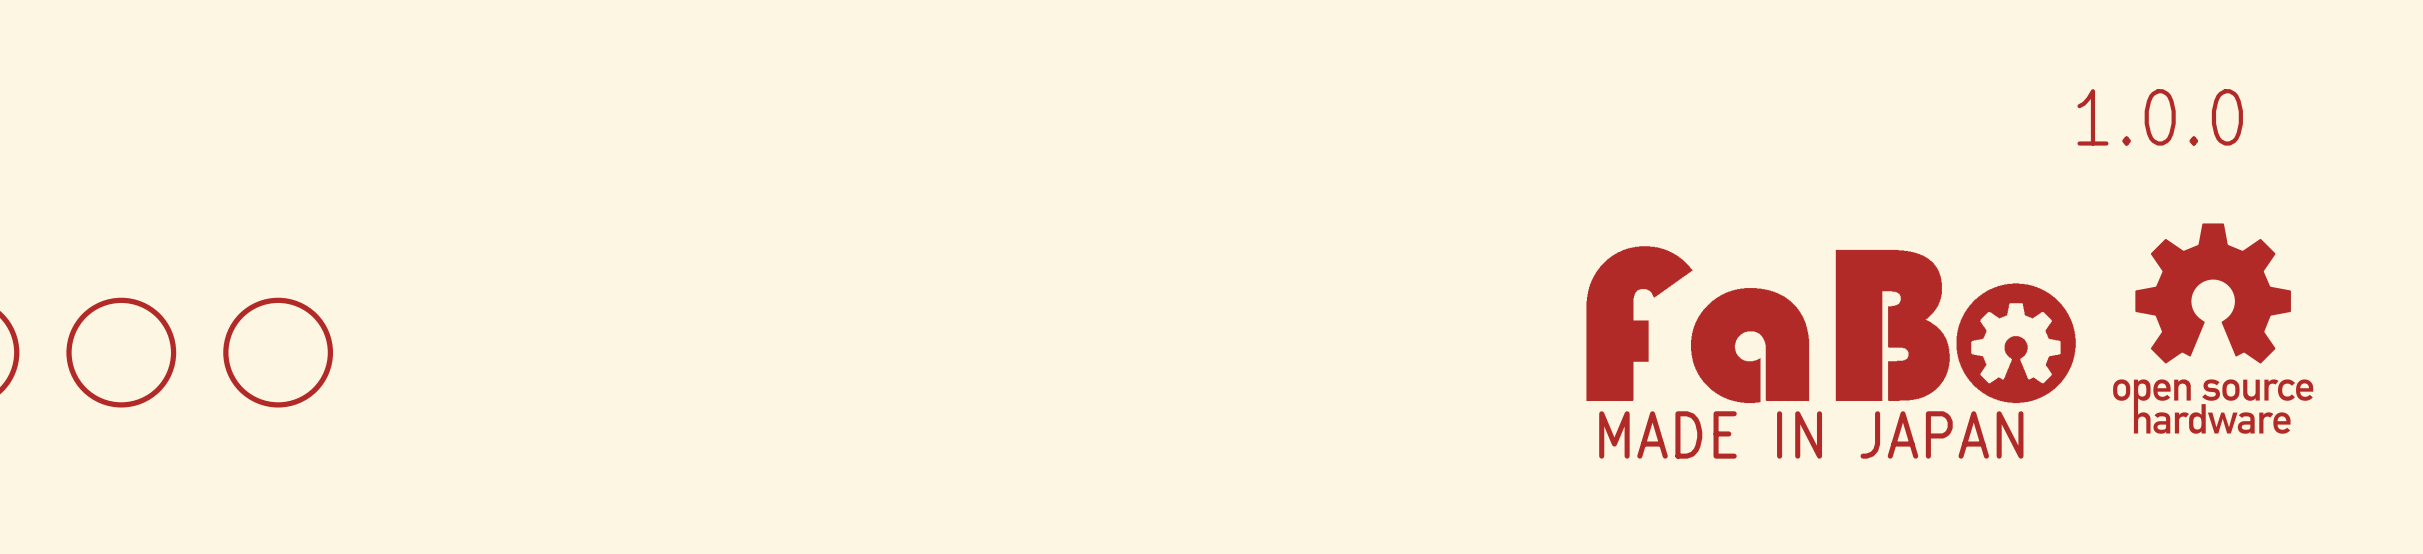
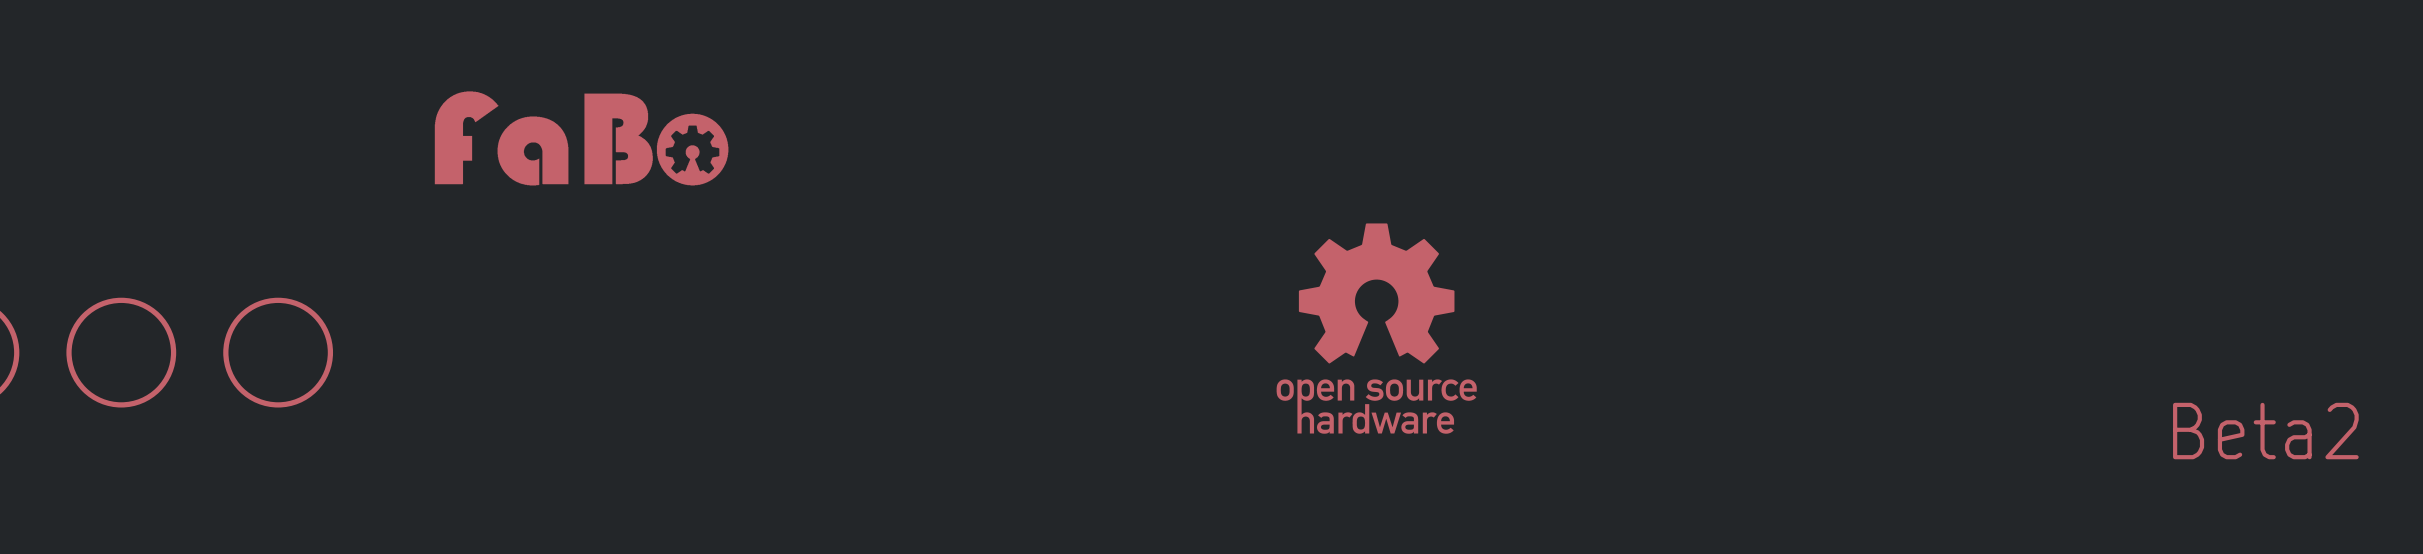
text: 1.0.0 (2160, 117) -> none
part: none -> (581, 138)
part: (1831, 324) -> none
part: none -> (1376, 328)
part: (2213, 328) -> none
text: none -> Beta2 (2265, 431)

